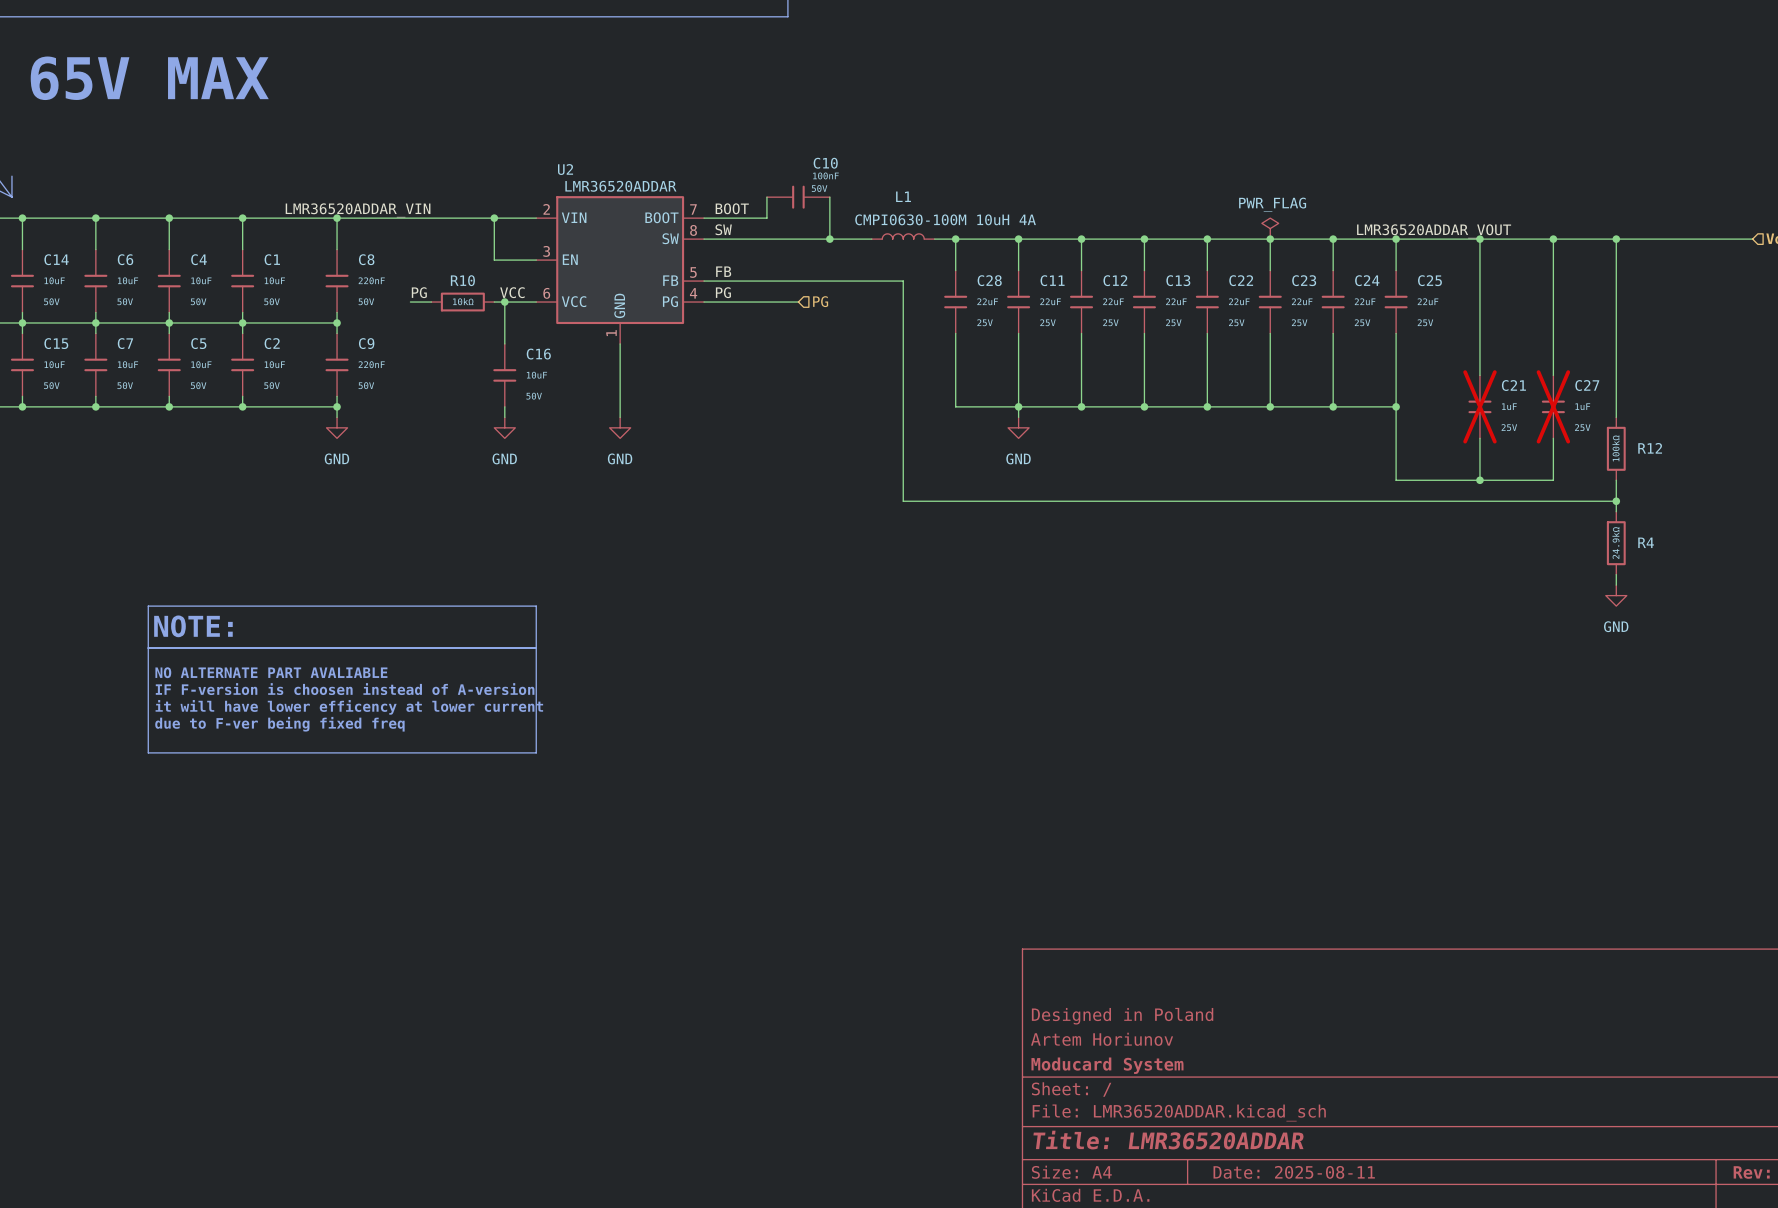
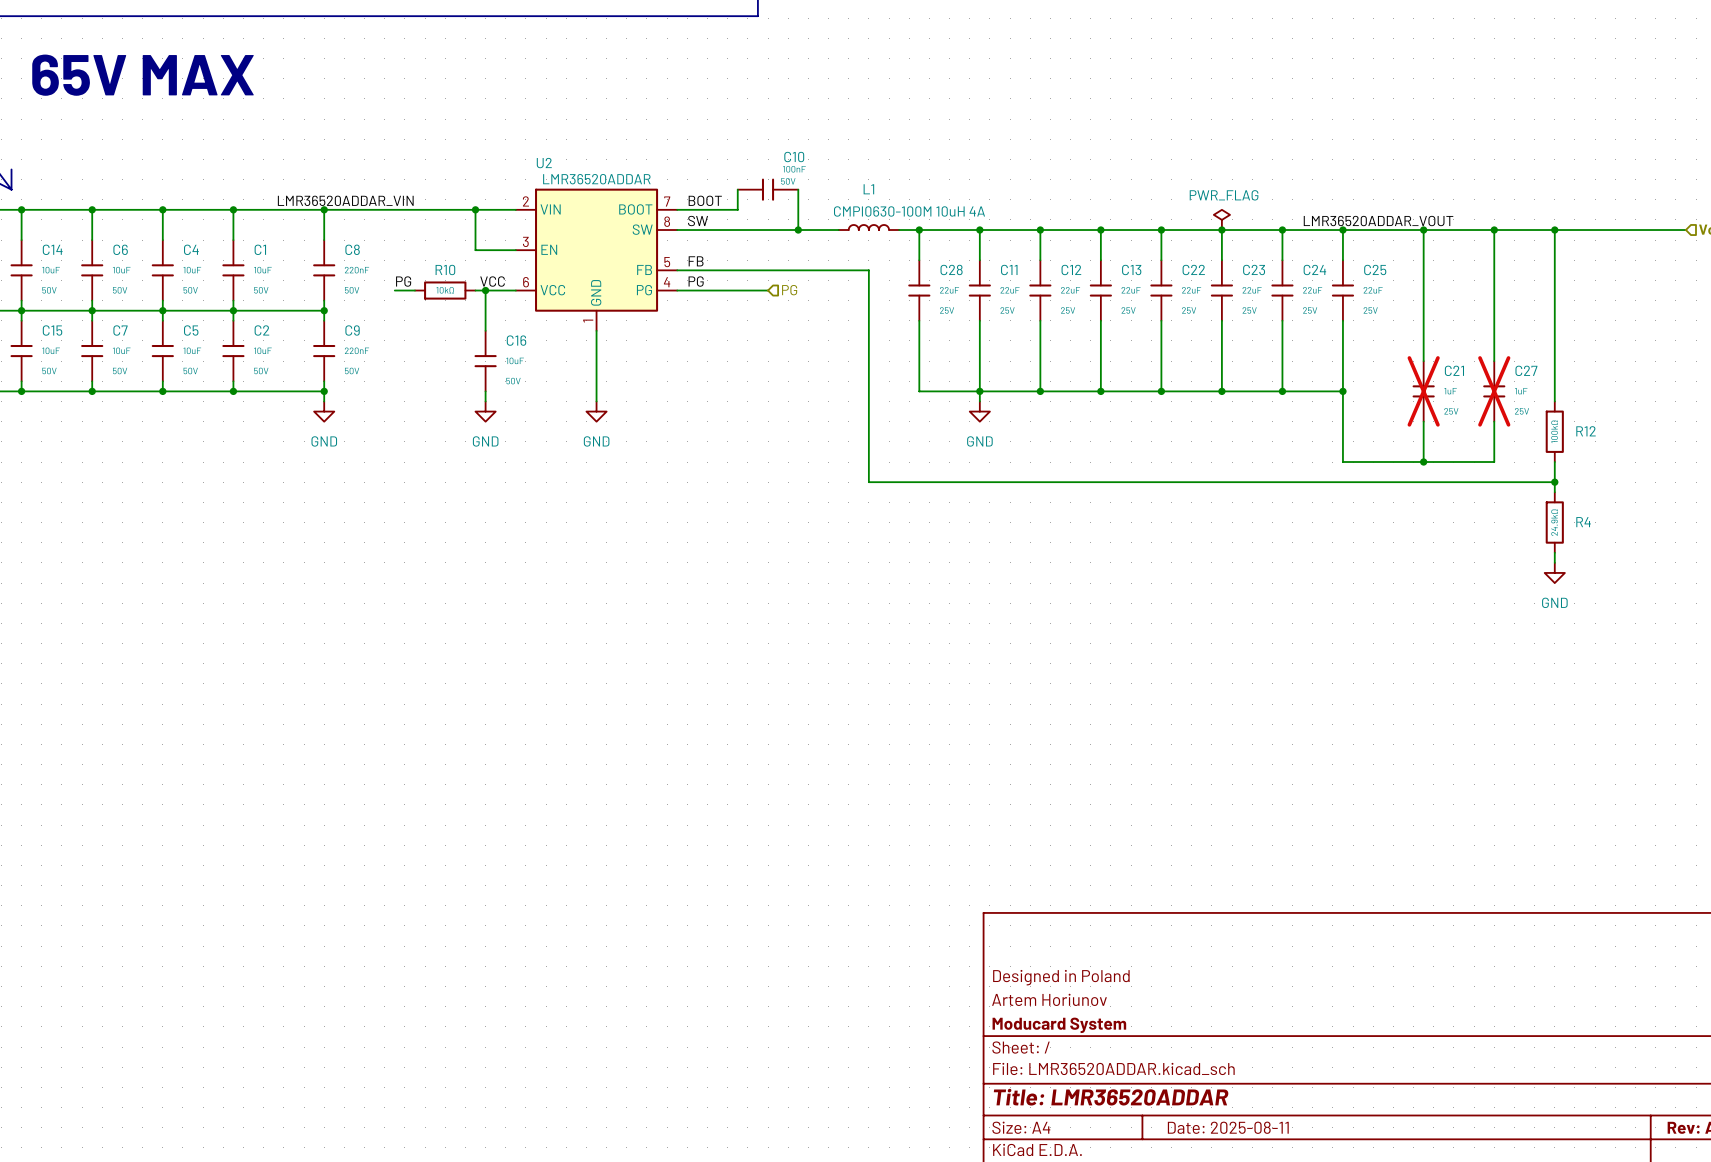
line: (148, 606) (148, 752) (536, 752) (536, 606) (148, 606) -> none
text: NOTE: (193, 626) -> none
line: (148, 648) (536, 648) -> none
text: NO ALTERNATE PART AVALIABLE (271, 672) -> none
text: IF F-version is choosen instead of A-version (345, 689) -> none
text: it will have lower efficency at lower current (349, 707) -> none
text: due to F-ver being fixed freq (279, 724) -> none

